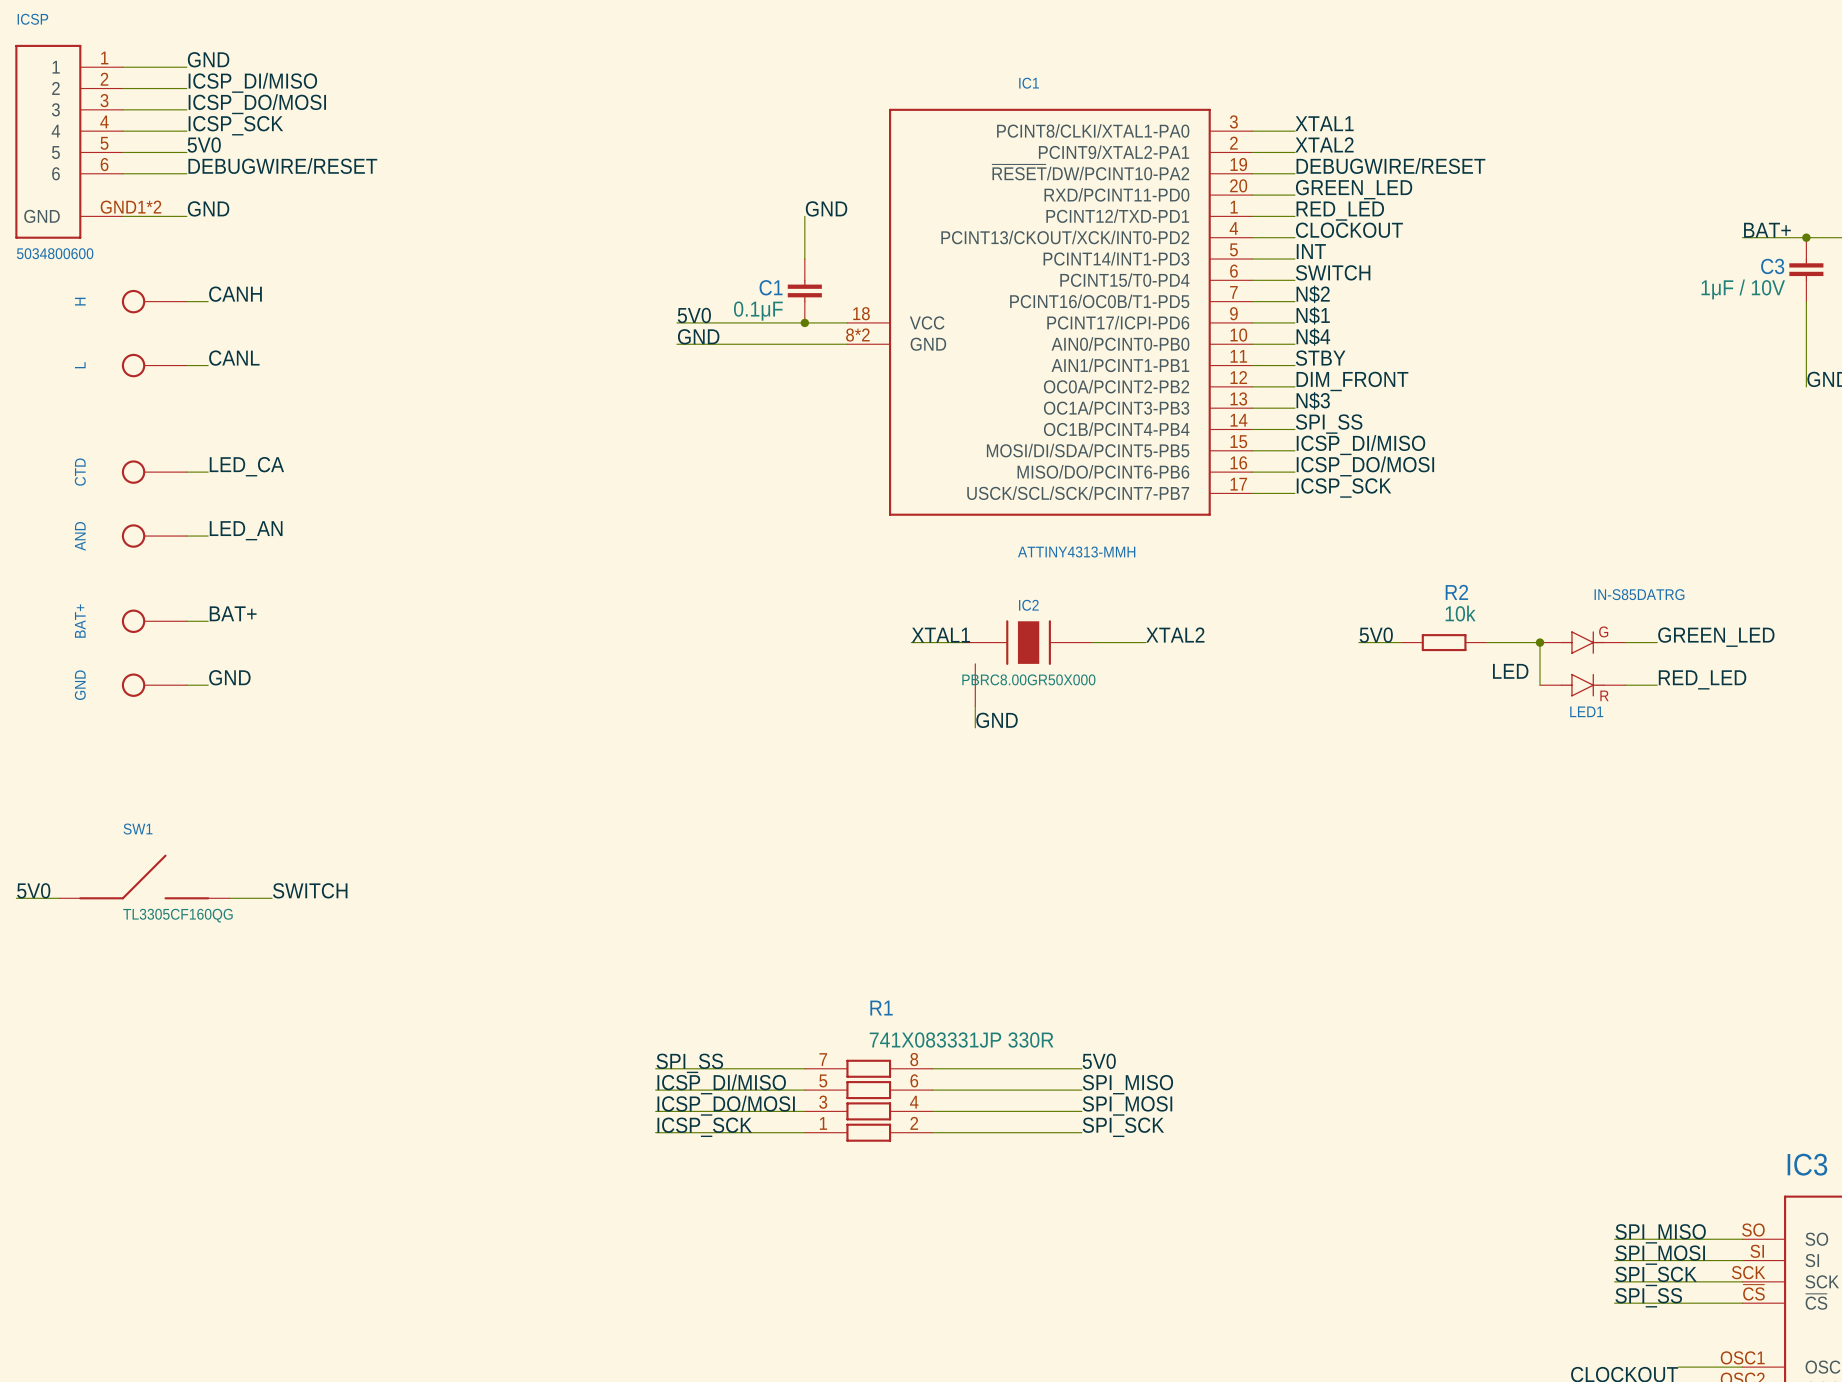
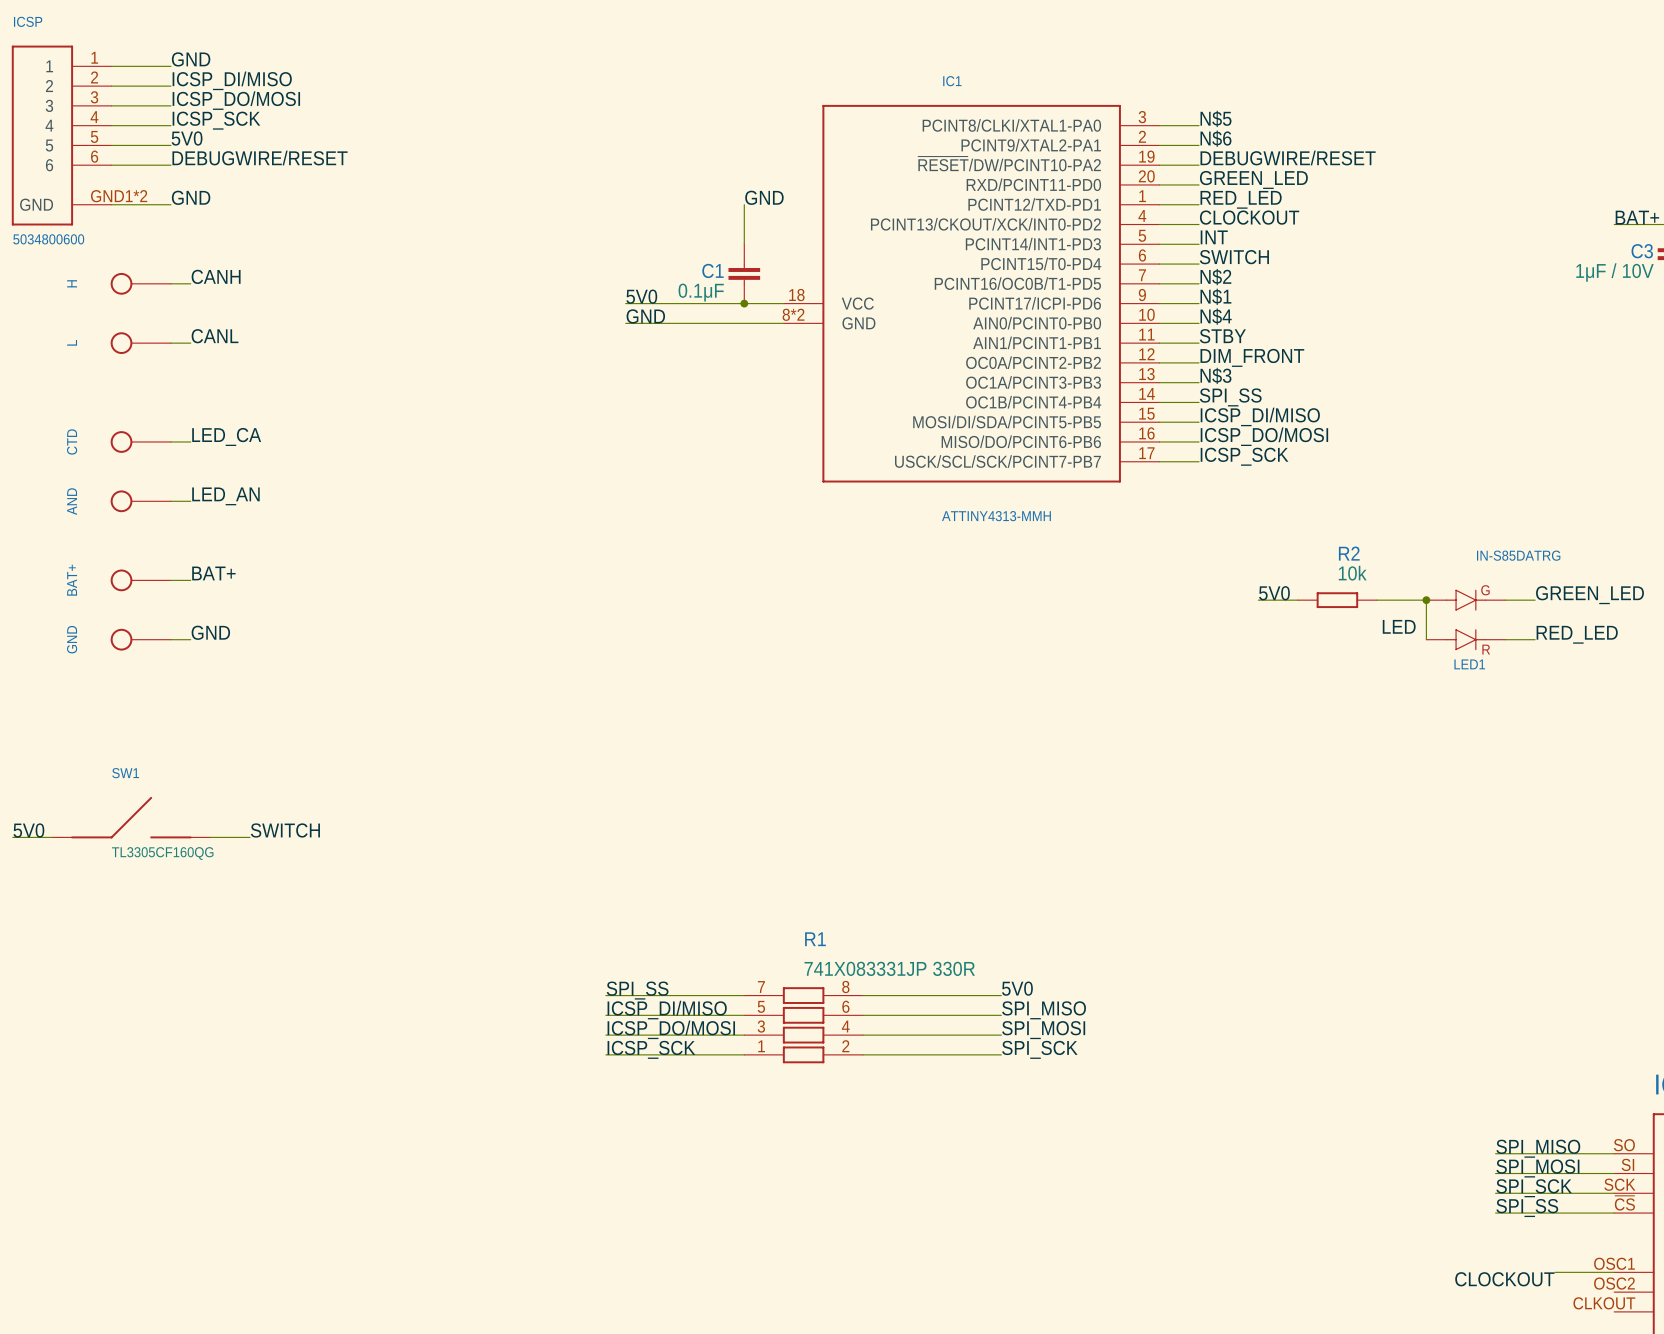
label: XTAL1 (1324, 123) -> N$5 (1215, 118)
label: XTAL2 (1324, 144) -> N$6 (1215, 138)
label: XTAL1 (940, 635) -> none
label: XTAL2 (1175, 635) -> none
wire: (911, 642) (964, 642) -> none
wire: (1092, 642) (1145, 642) -> none
IC2: PBRC8.00GR50X000 (1028, 663) -> none
wire: (975, 706) (975, 727) -> none
label: GND (997, 720) -> none

